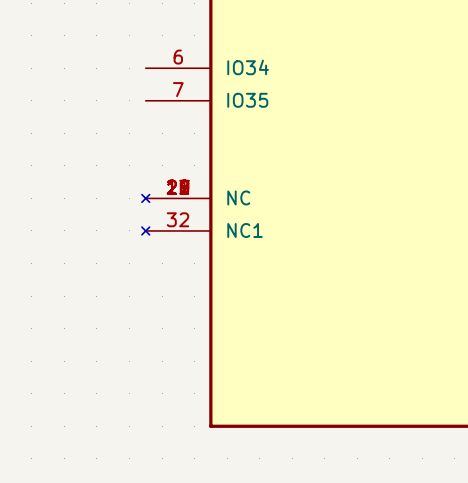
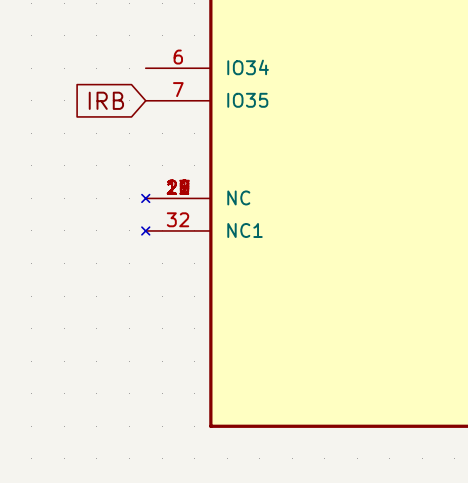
global label: none -> IRB (106, 100)

